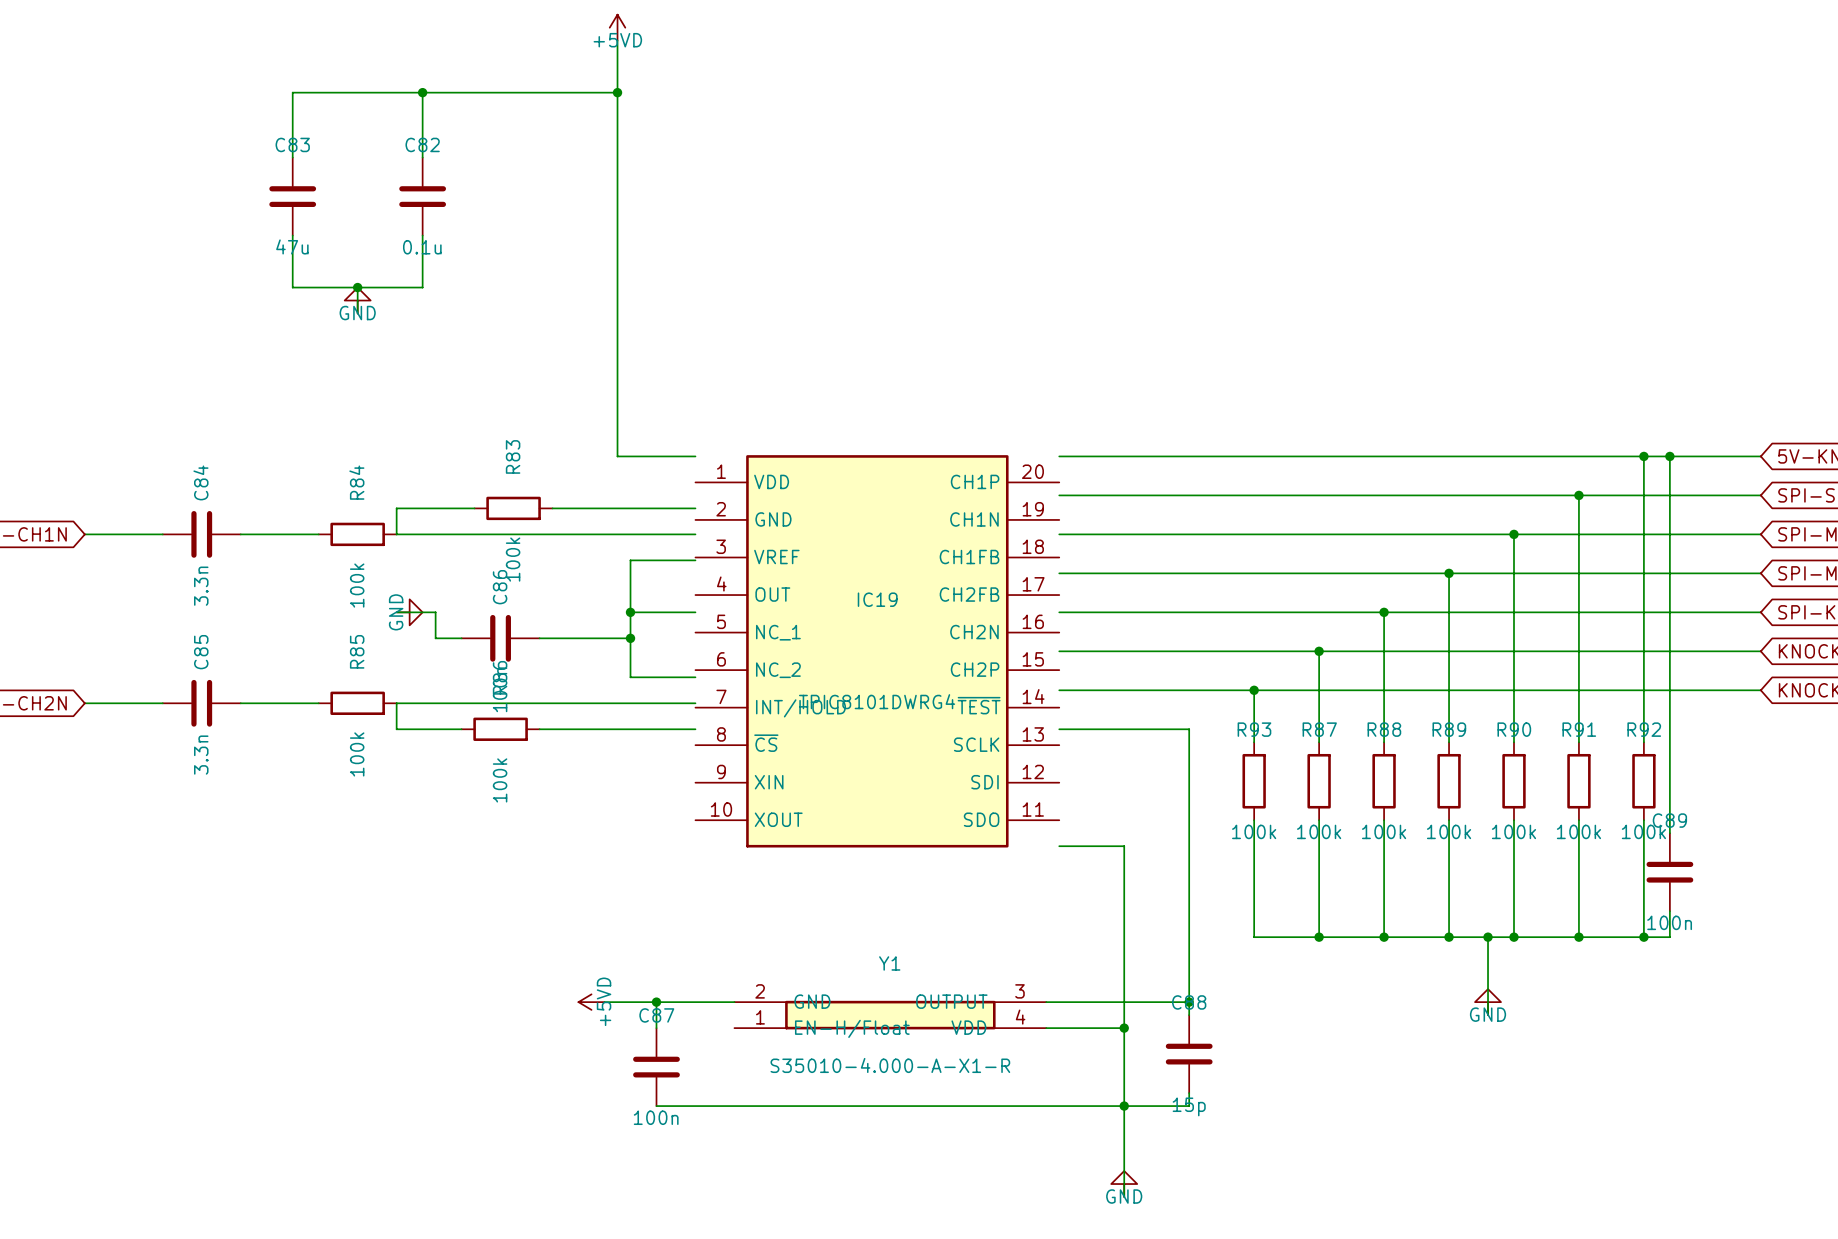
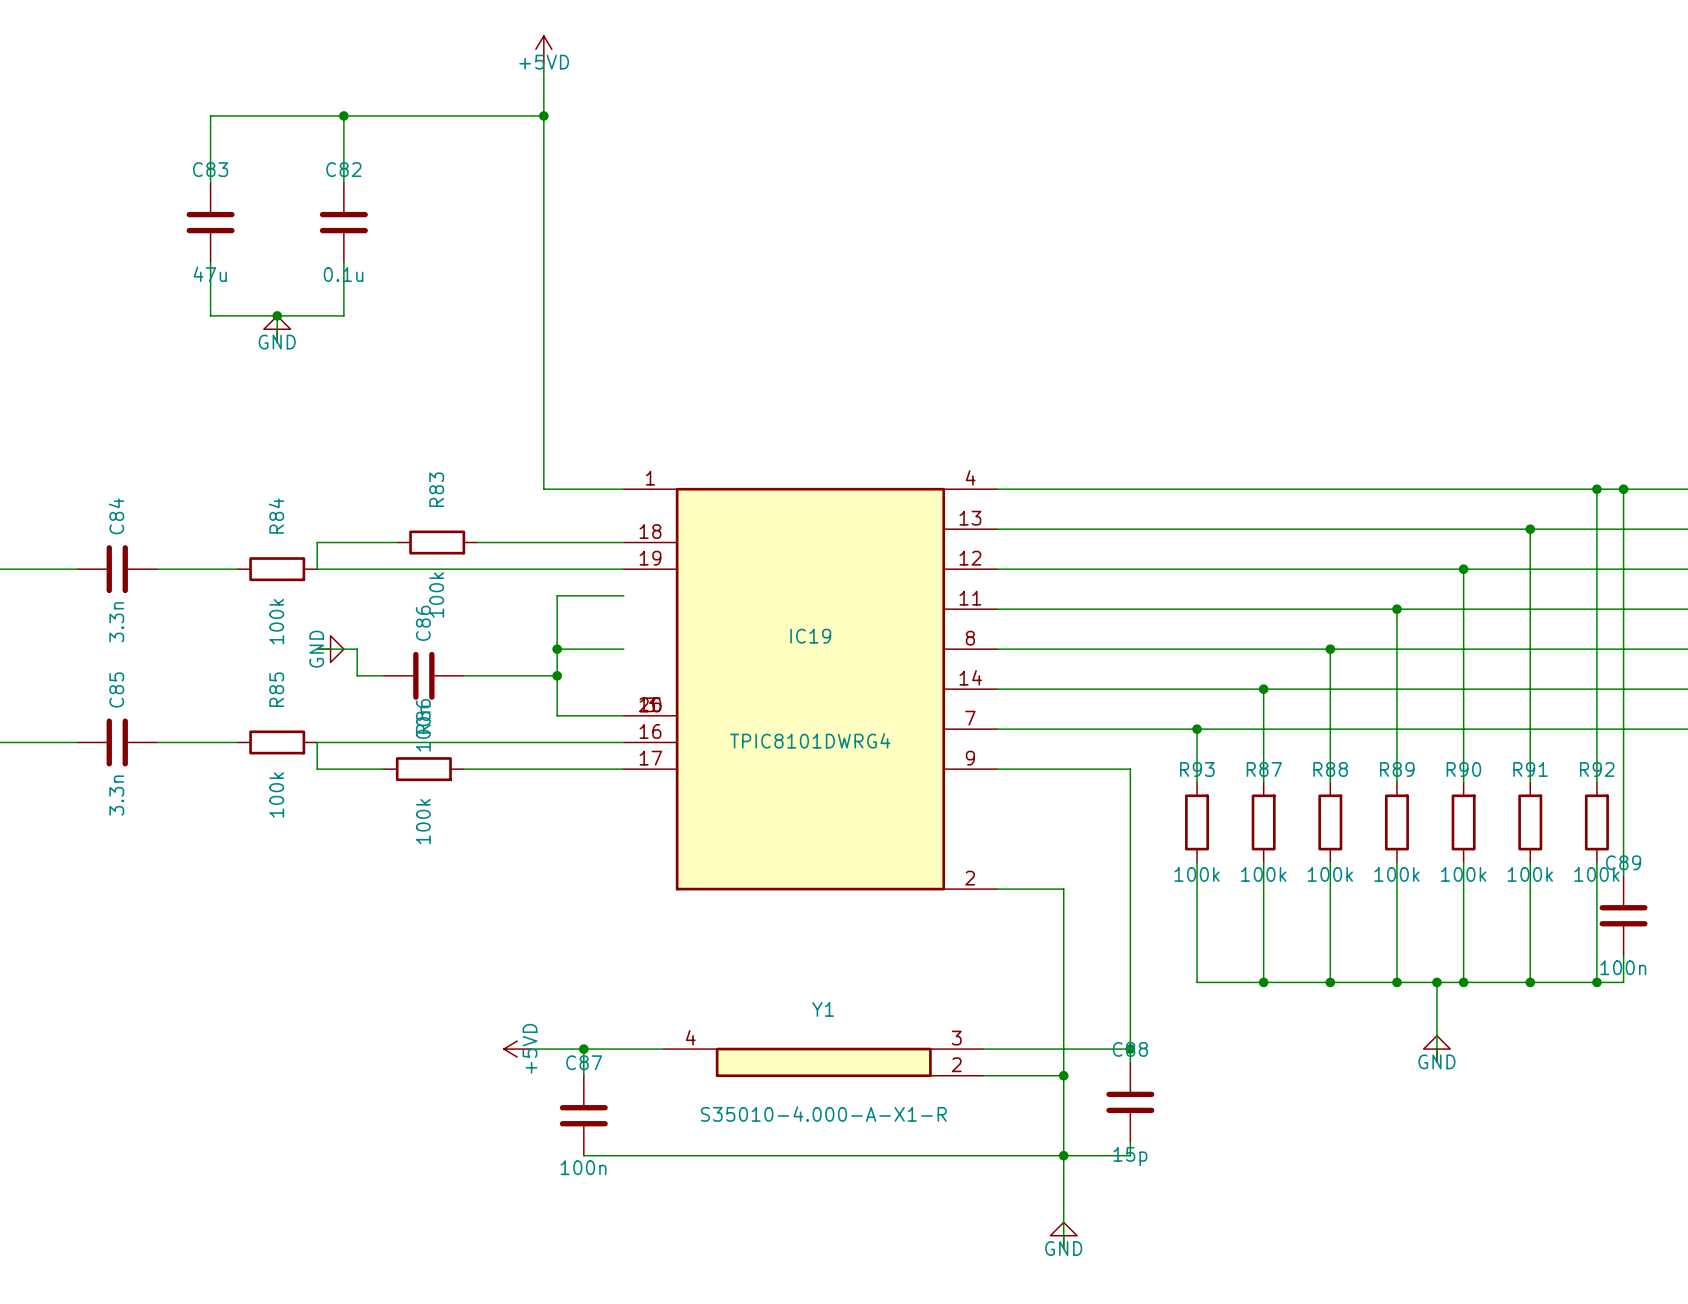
IC19 symbol: [695, 455, 1060, 848] -> [623, 487, 998, 891]
Y1 symbol: [734, 1000, 1047, 1030] -> [663, 1047, 984, 1078]

